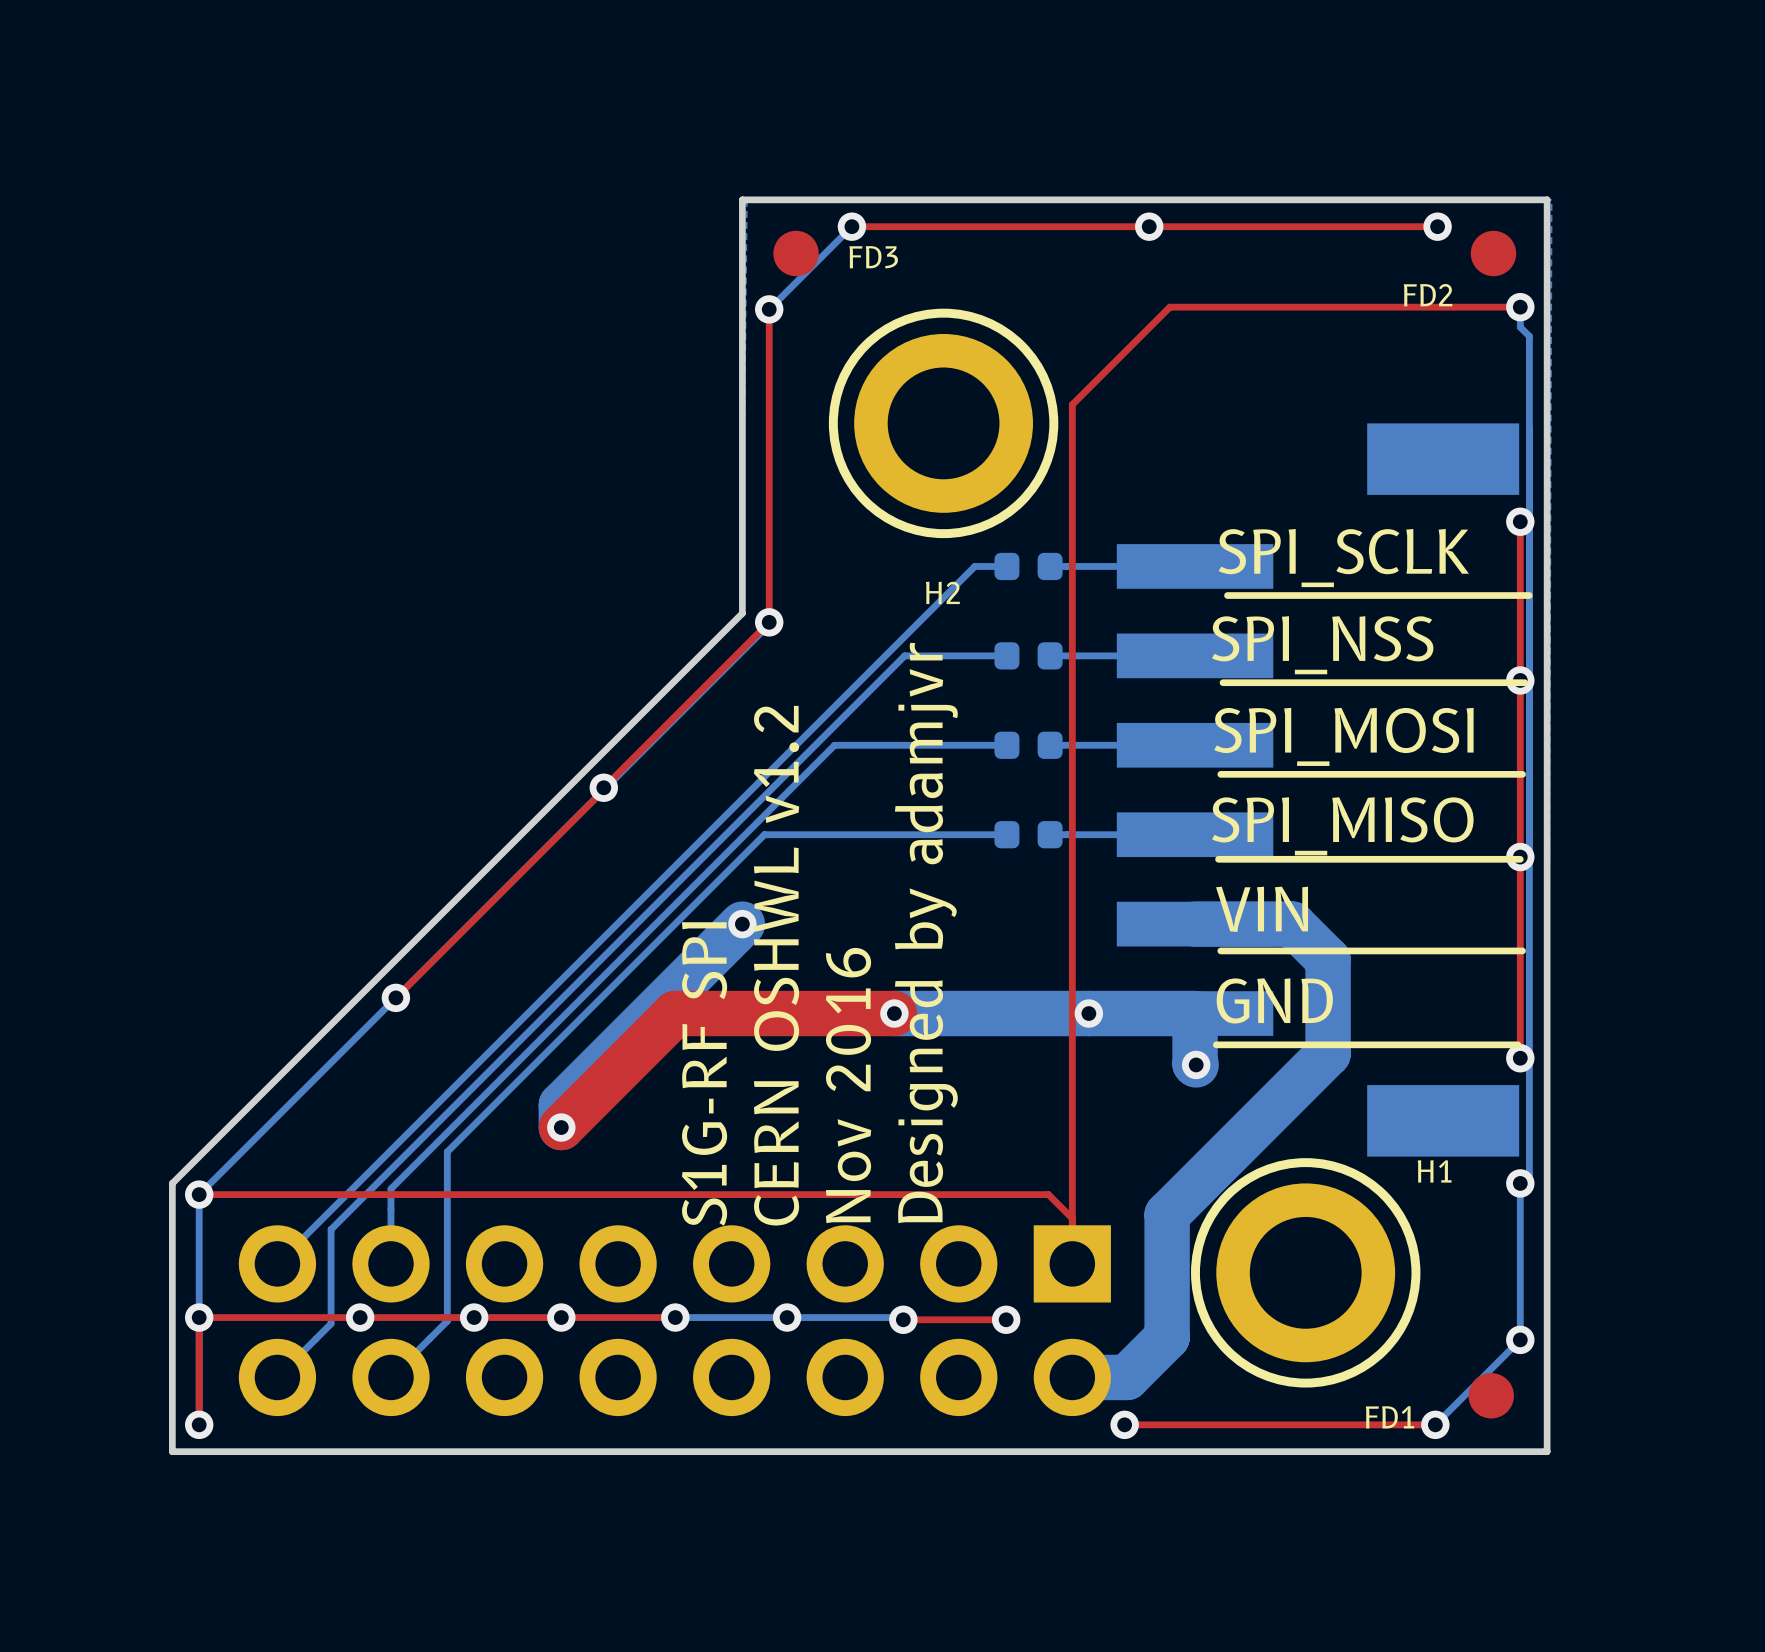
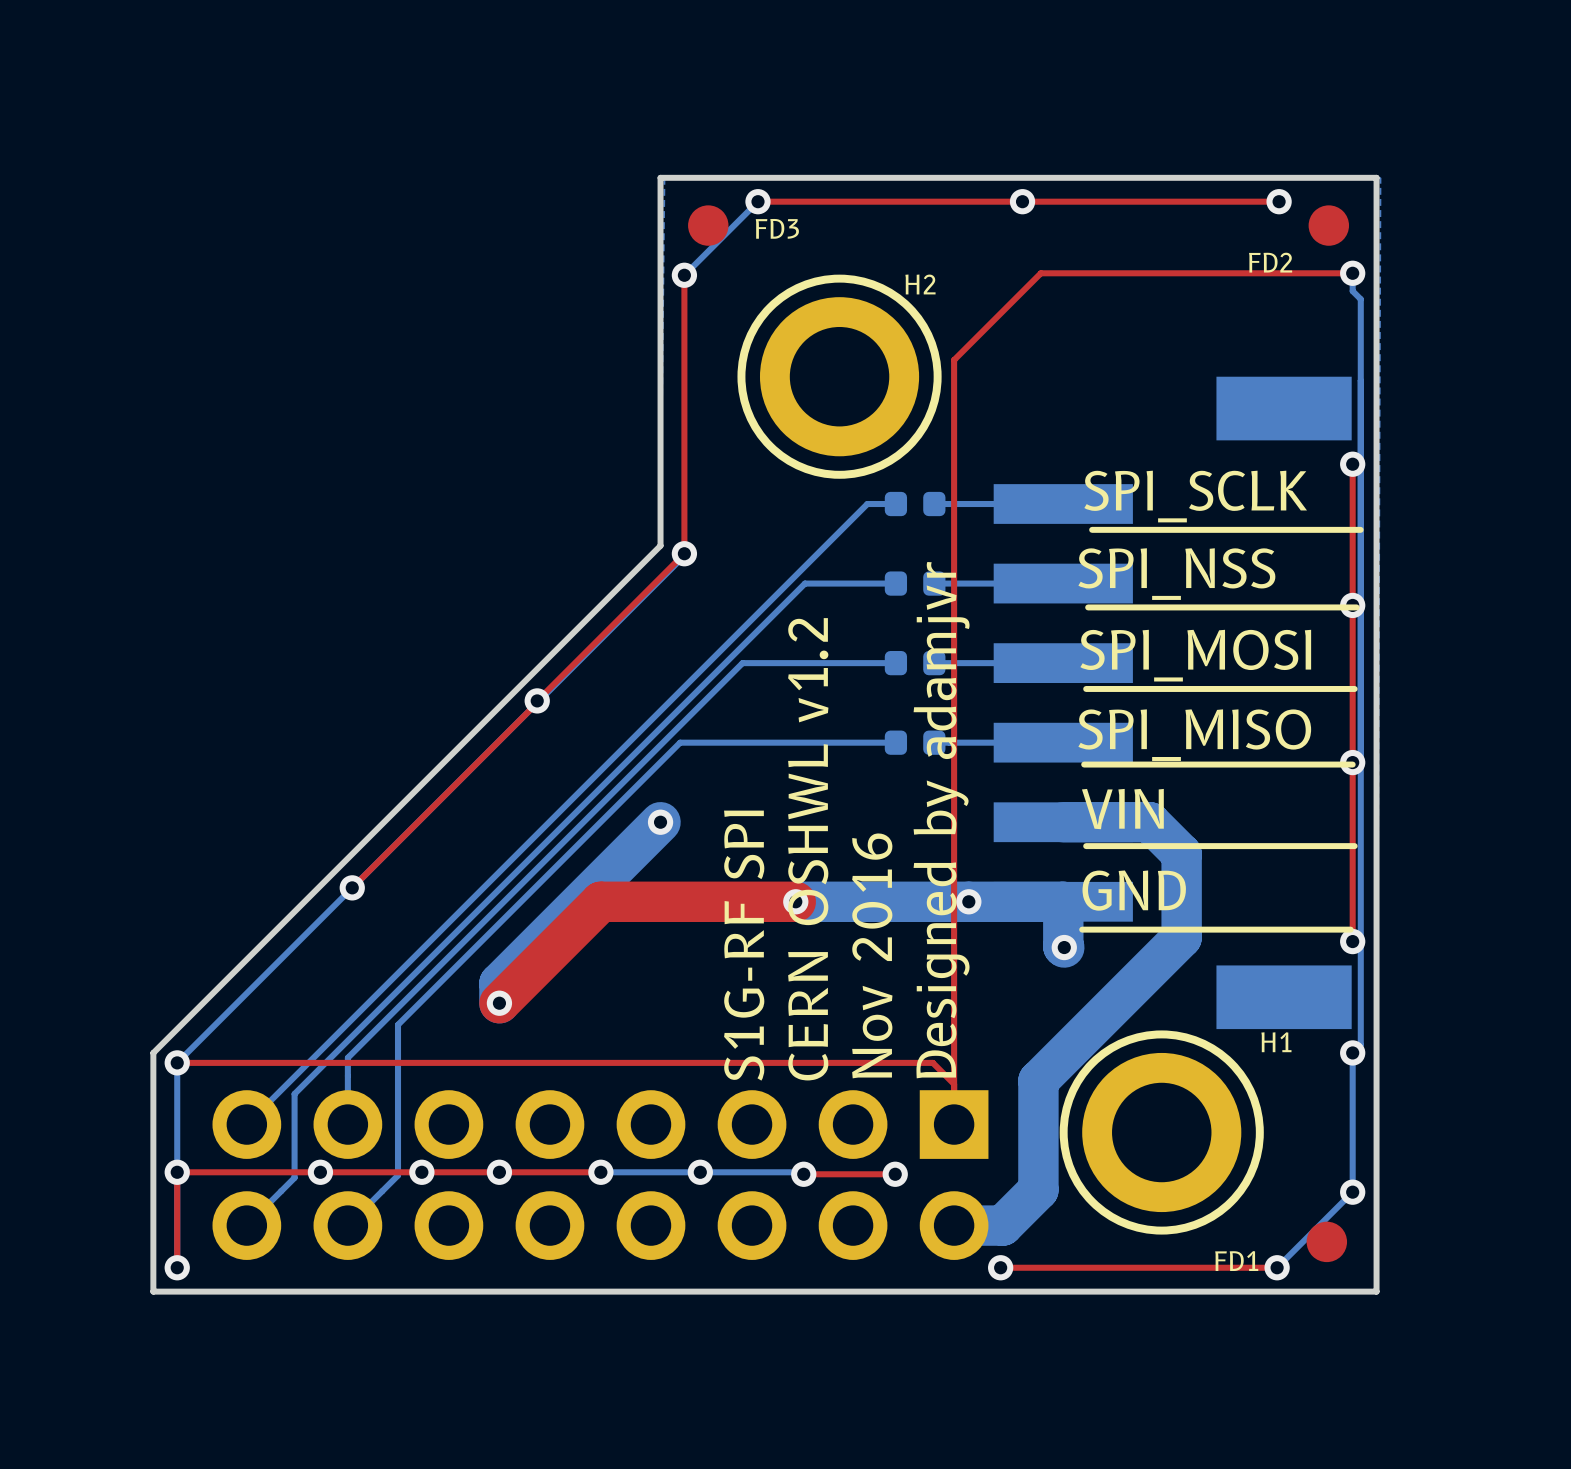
H2 name position: H2 (942, 592) -> H2 (920, 284)
text position: Designed by adamjvr (926, 932) -> Designed by adamjvr (941, 820)
text position: CERN OSHWL v1.2 (776, 965) -> CERN OSHWL v1.2 (808, 849)
text position: S1G-RF SPI (704, 1073) -> S1G-RF SPI (744, 945)
text position: Nov 2016 (848, 1085) -> Nov 2016 (872, 955)

